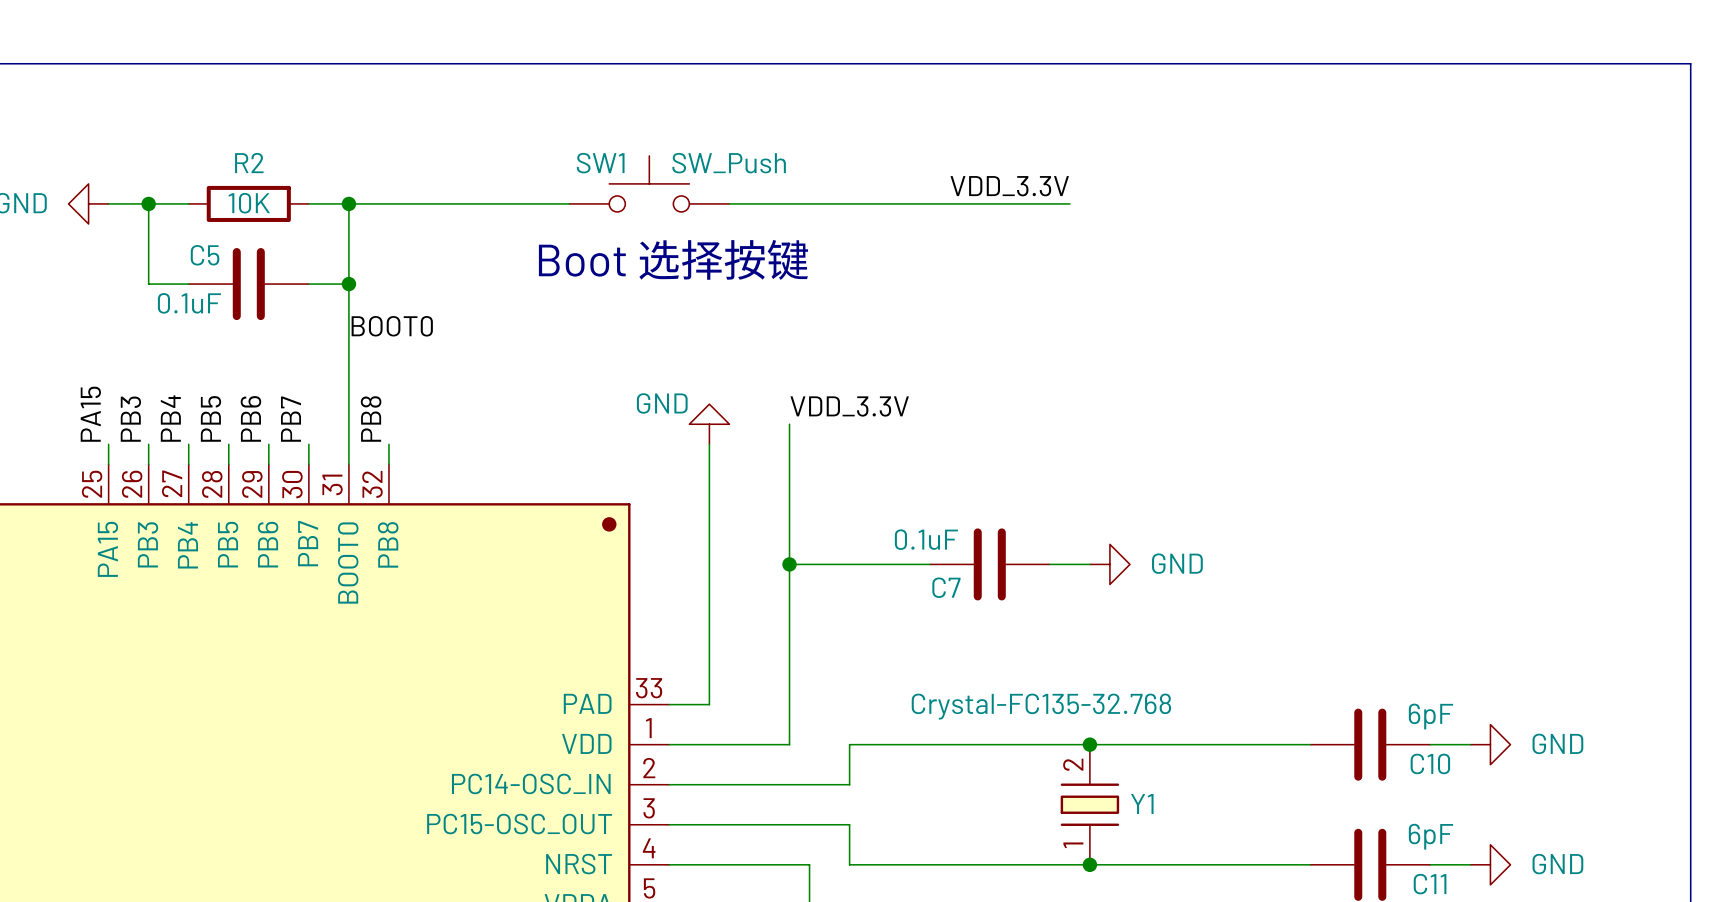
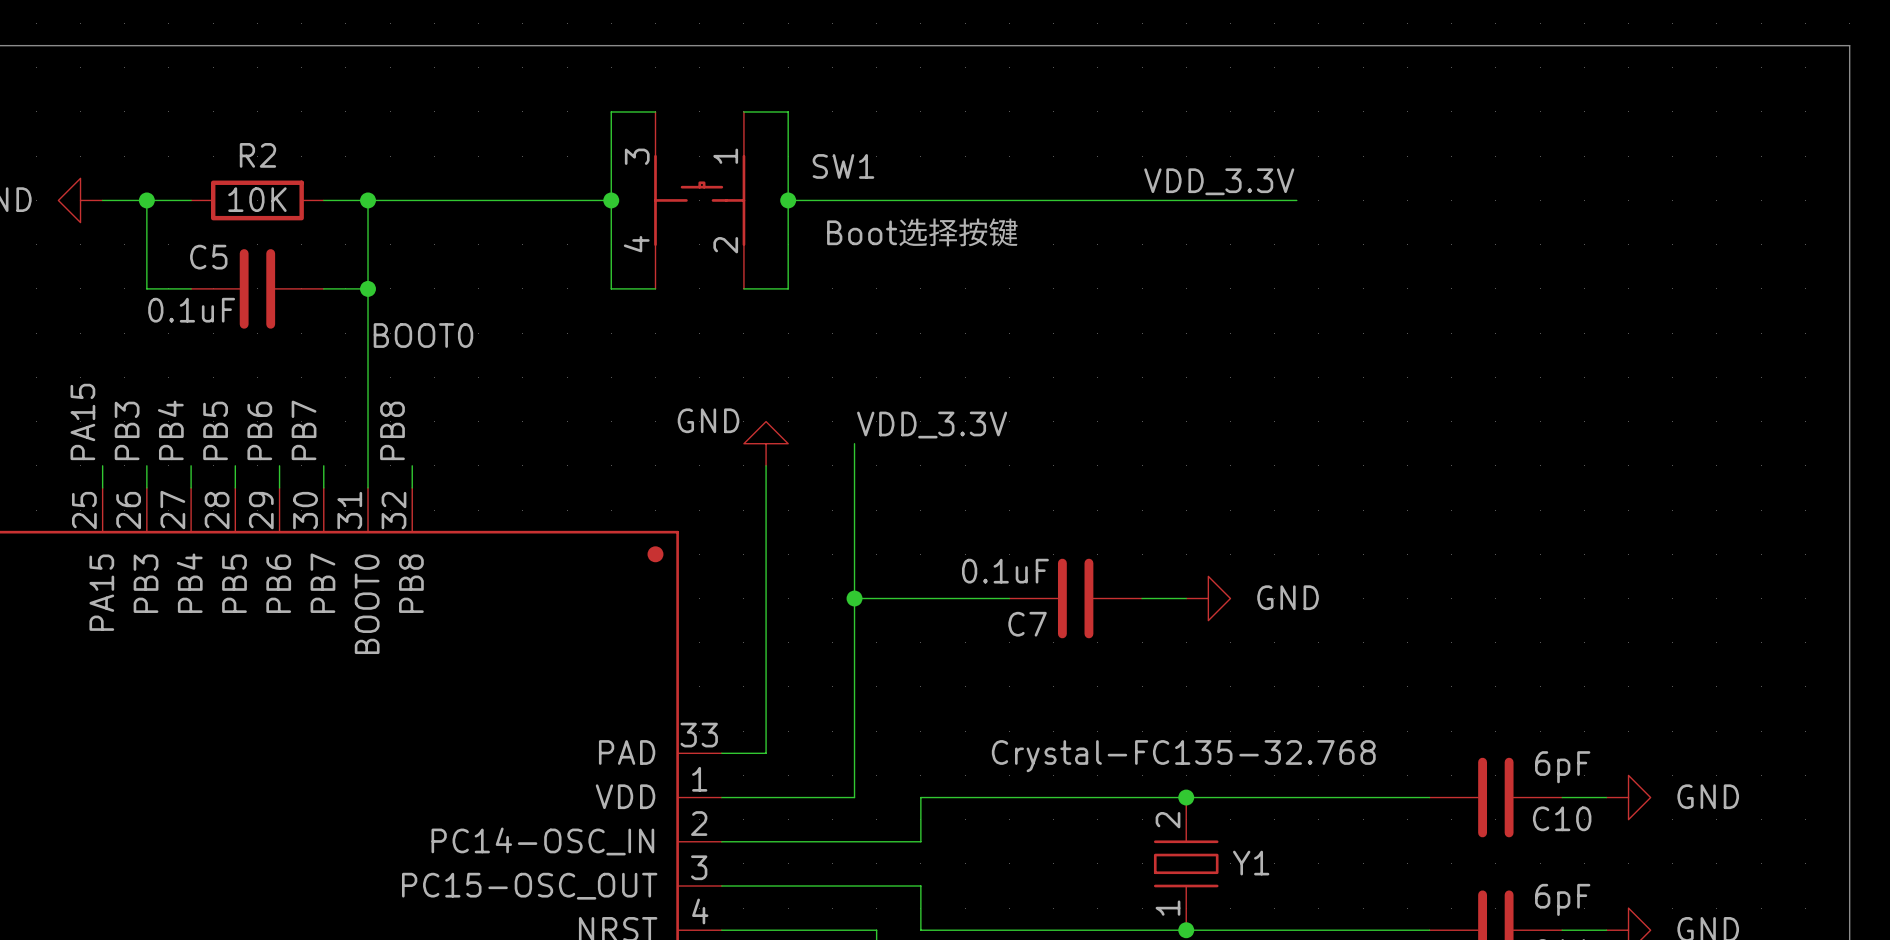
wire: none -> (655, 111) (611, 111) (611, 288) (655, 288)
wire: none -> (743, 111) (788, 111) (788, 288) (743, 288)
SW1 symbol: [569, 155, 730, 212] -> [654, 111, 746, 289]
SW1 name position: SW1 (600, 163) -> SW1 (843, 166)
SW1 value: SW_Push (729, 163) -> Boot选择按键 (922, 232)
label position: VDD_3.3V (1009, 186) -> VDD_3.3V (1219, 181)
junction: none -> (611, 200)
junction: none -> (788, 200)
wire: none -> (1164, 200) (1296, 200)
text: Boot 选择按键 (673, 259) -> none

